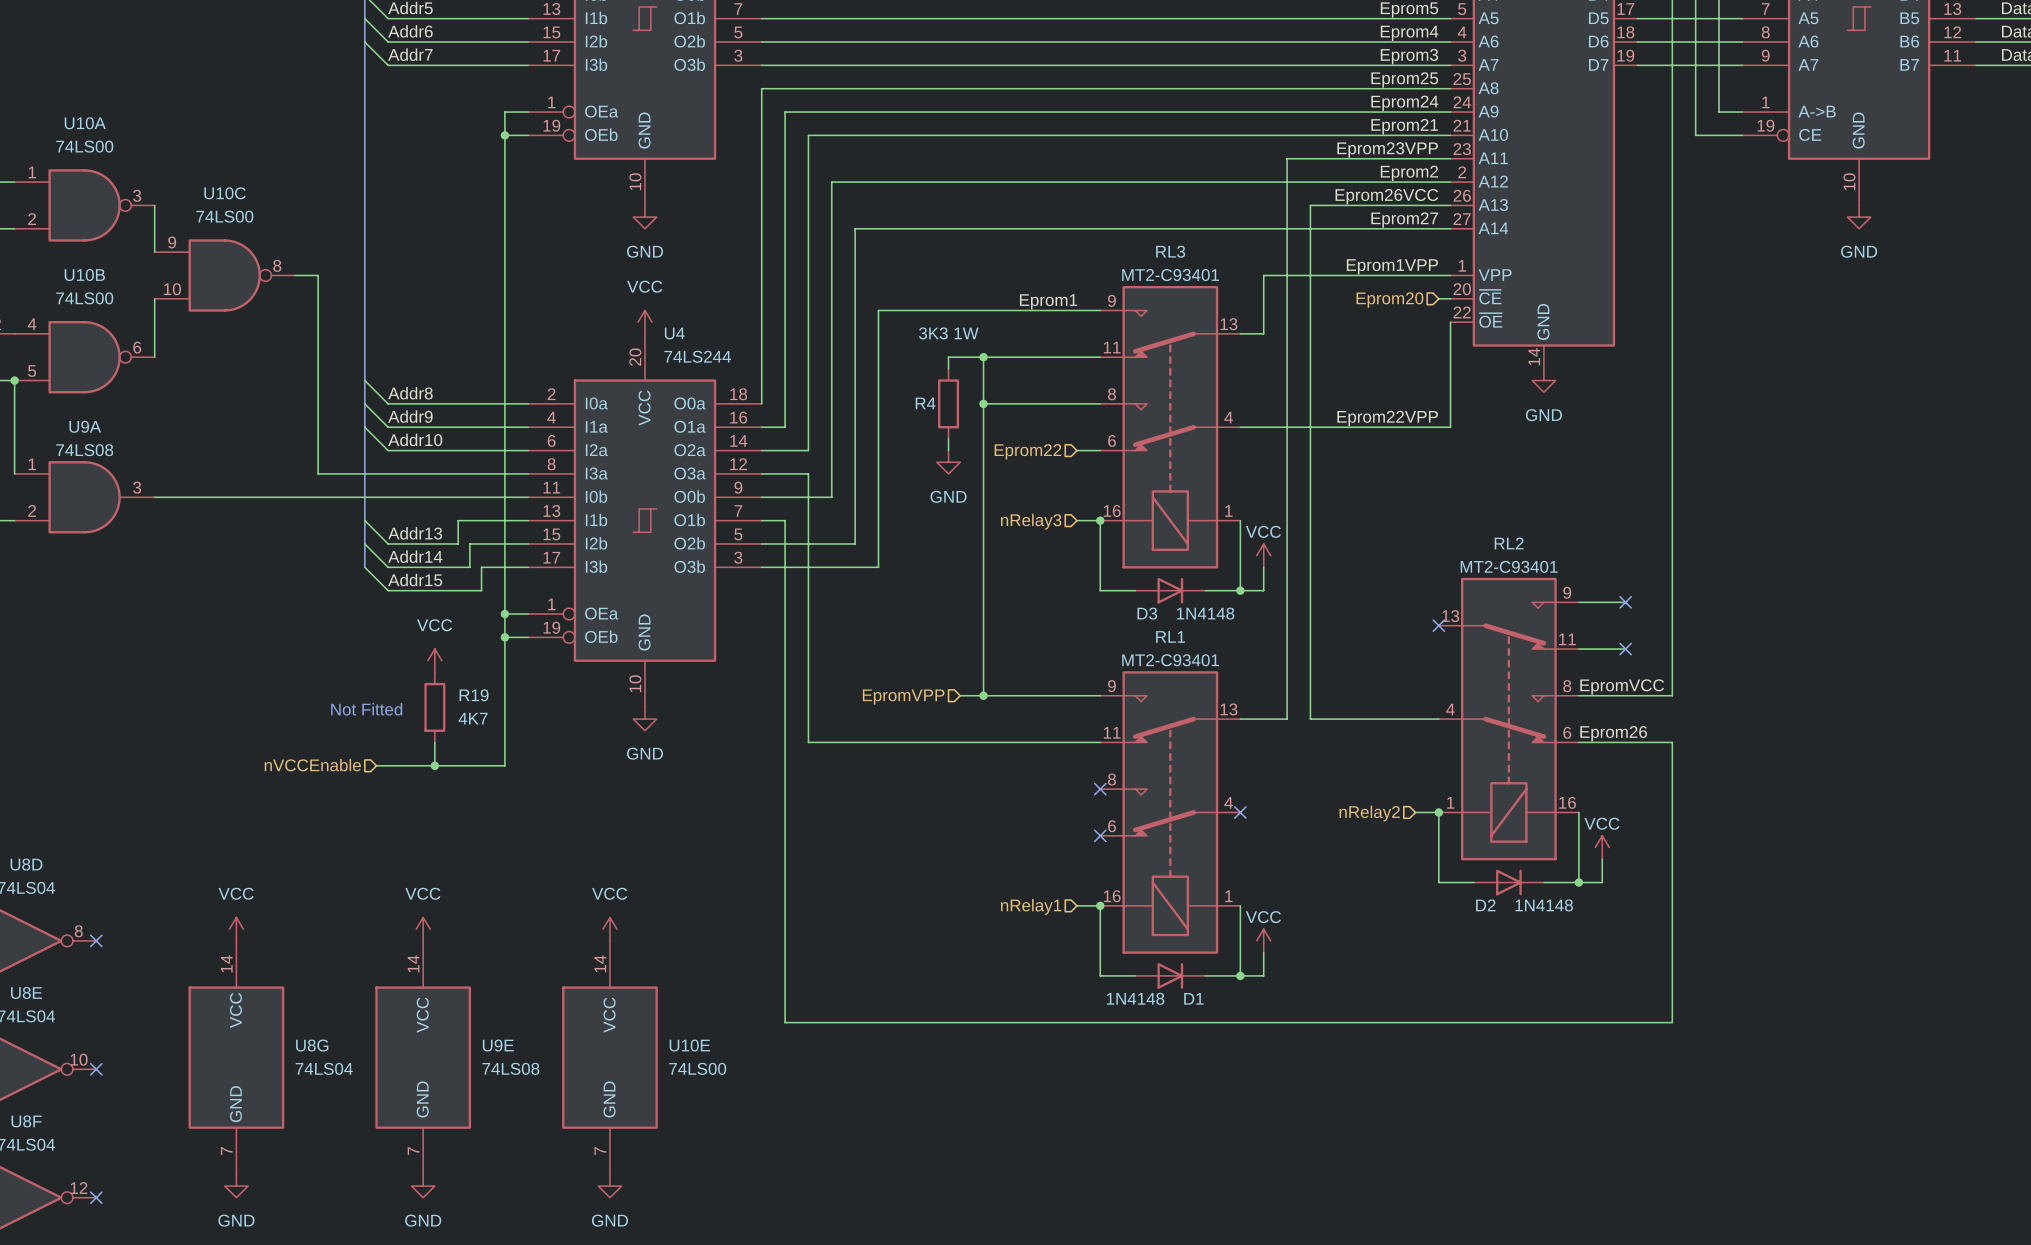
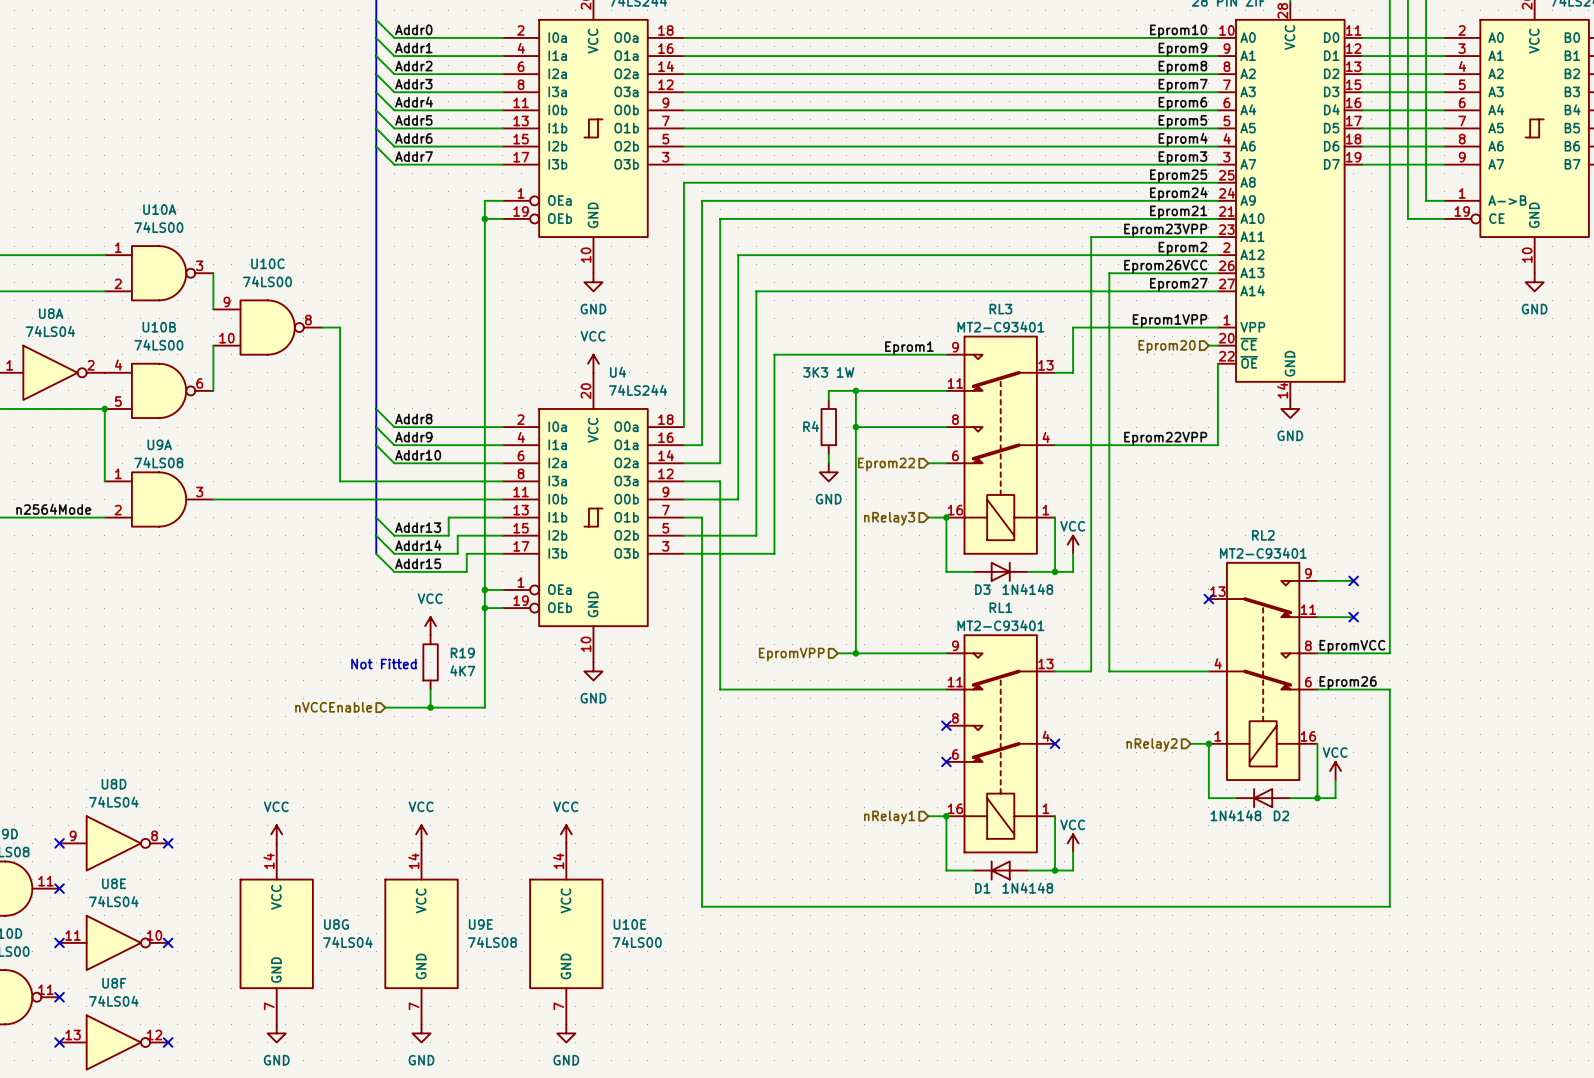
D2 rotation: 0° (1508, 882) -> 180° (1263, 798)
D2 name position: D2 (1485, 905) -> D2 (1281, 815)
D2 value position: 1N4148 (1544, 905) -> 1N4148 (1236, 815)
D1 rotation: 0° (1170, 975) -> 180° (1000, 870)
D1 value position: 1N4148 (1135, 998) -> 1N4148 (1027, 888)
D1 name position: D1 (1193, 998) -> D1 (982, 888)

